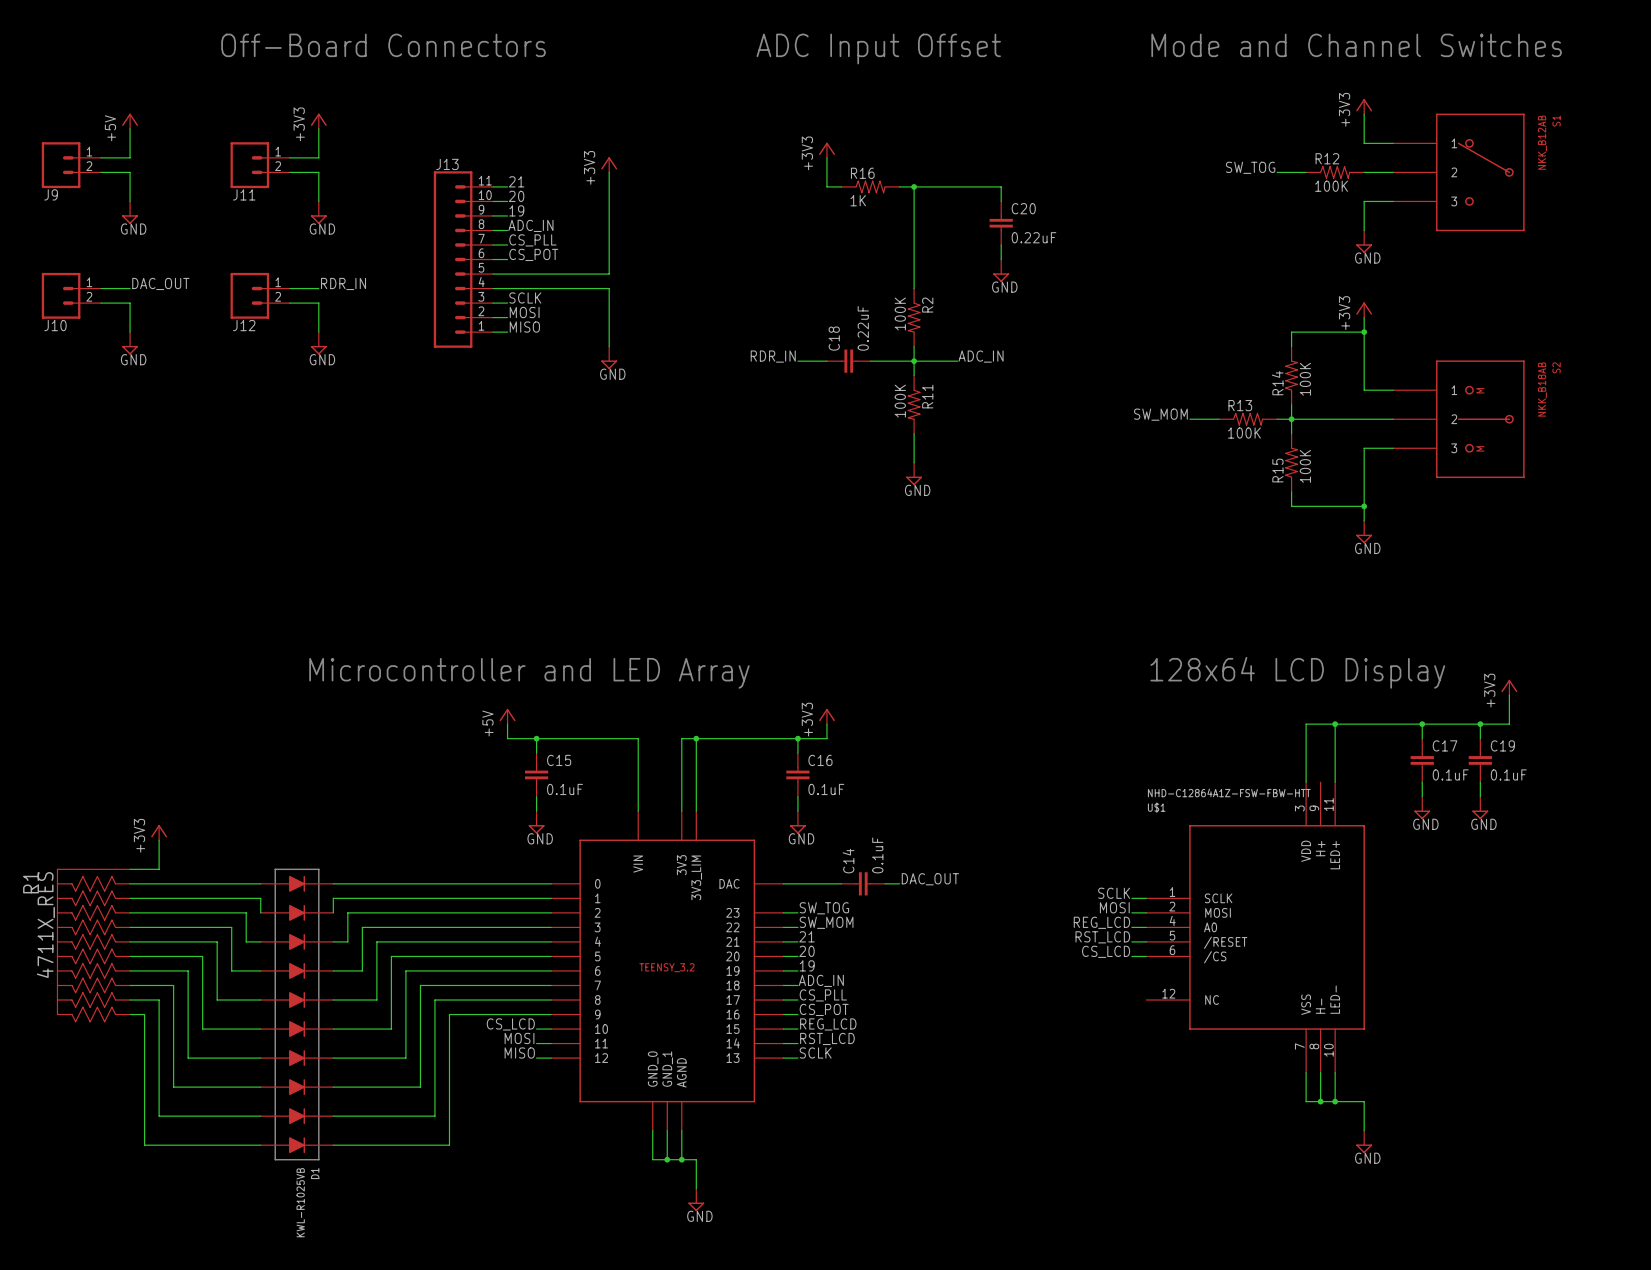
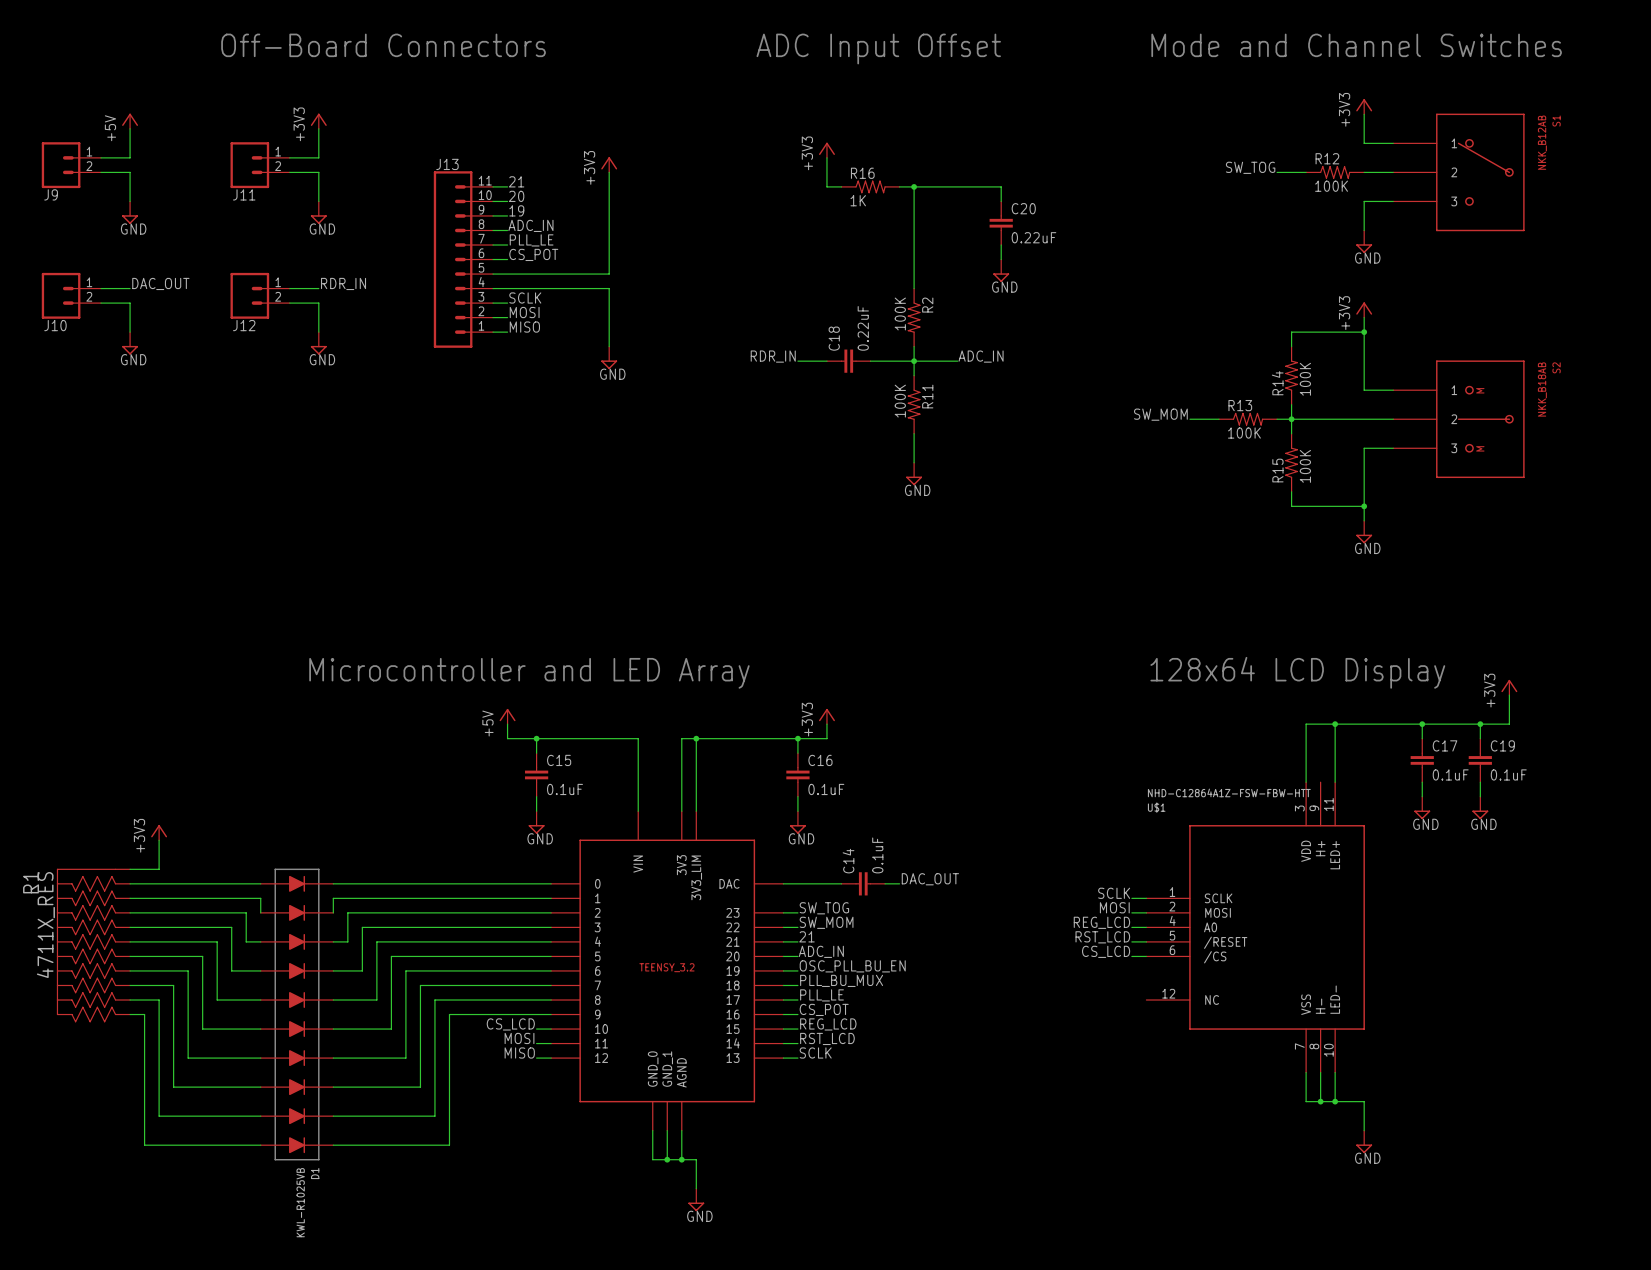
label: CS_PLL (532, 240) -> PLL_LE (531, 240)
label: 20 (806, 951) -> ADC_IN (821, 951)
label: 19 (807, 965) -> OSC_PLL_BU_EN (852, 966)
label: ADC_IN (821, 980) -> PLL_BU_MUX (841, 980)
label: CS_PLL (823, 995) -> PLL_LE (821, 995)

